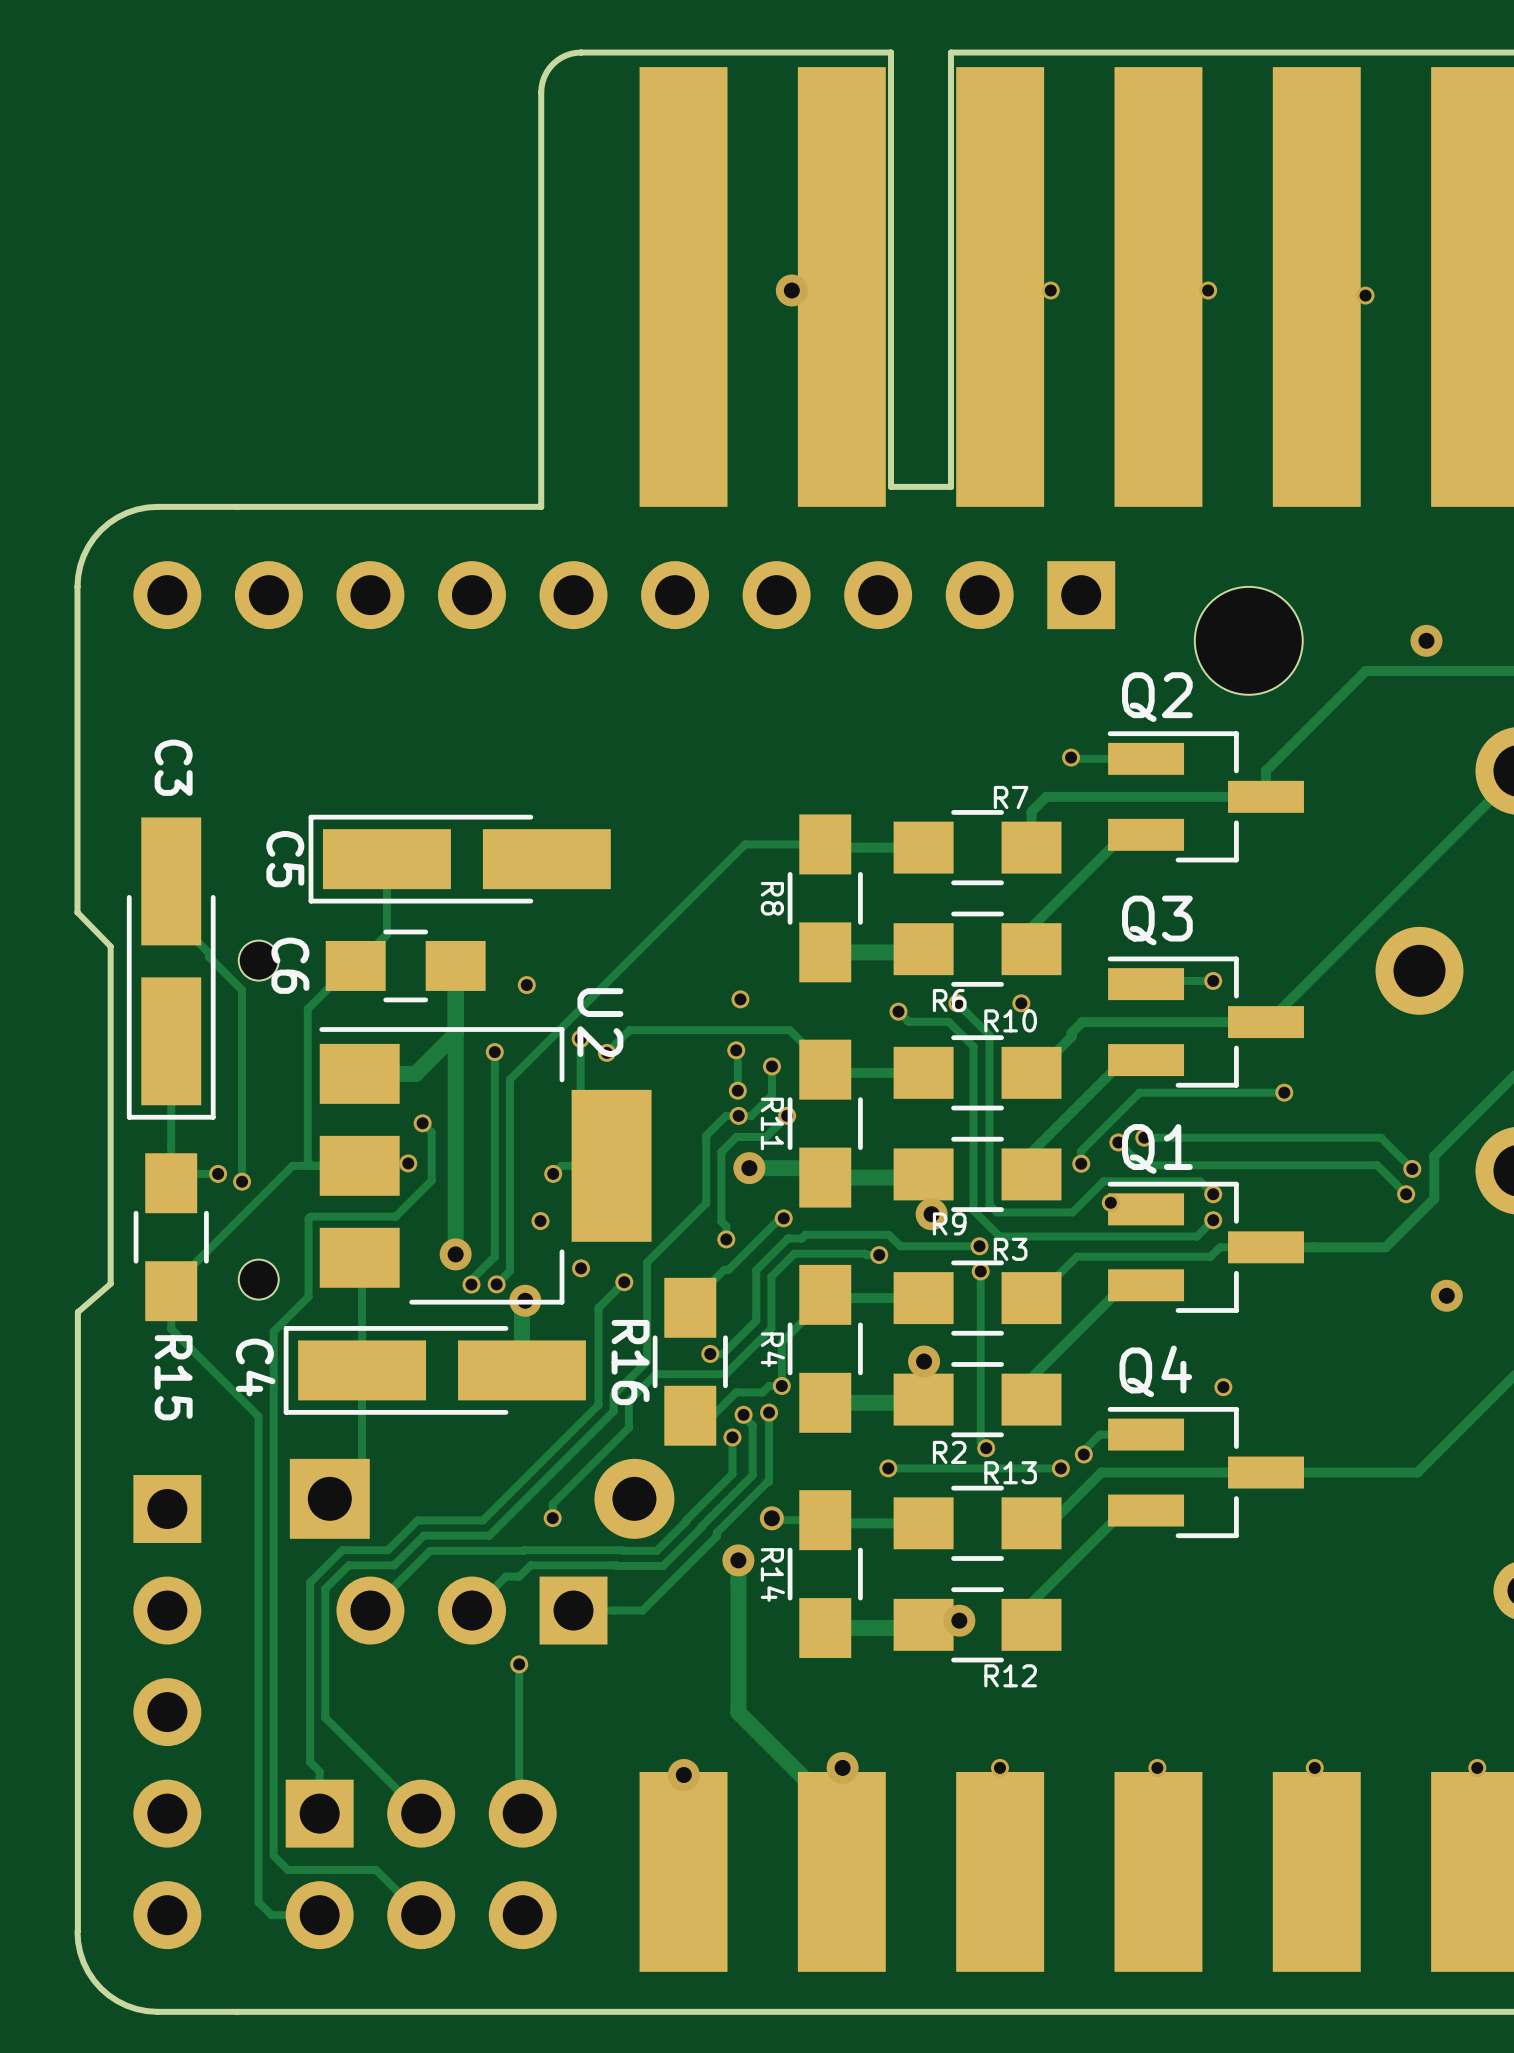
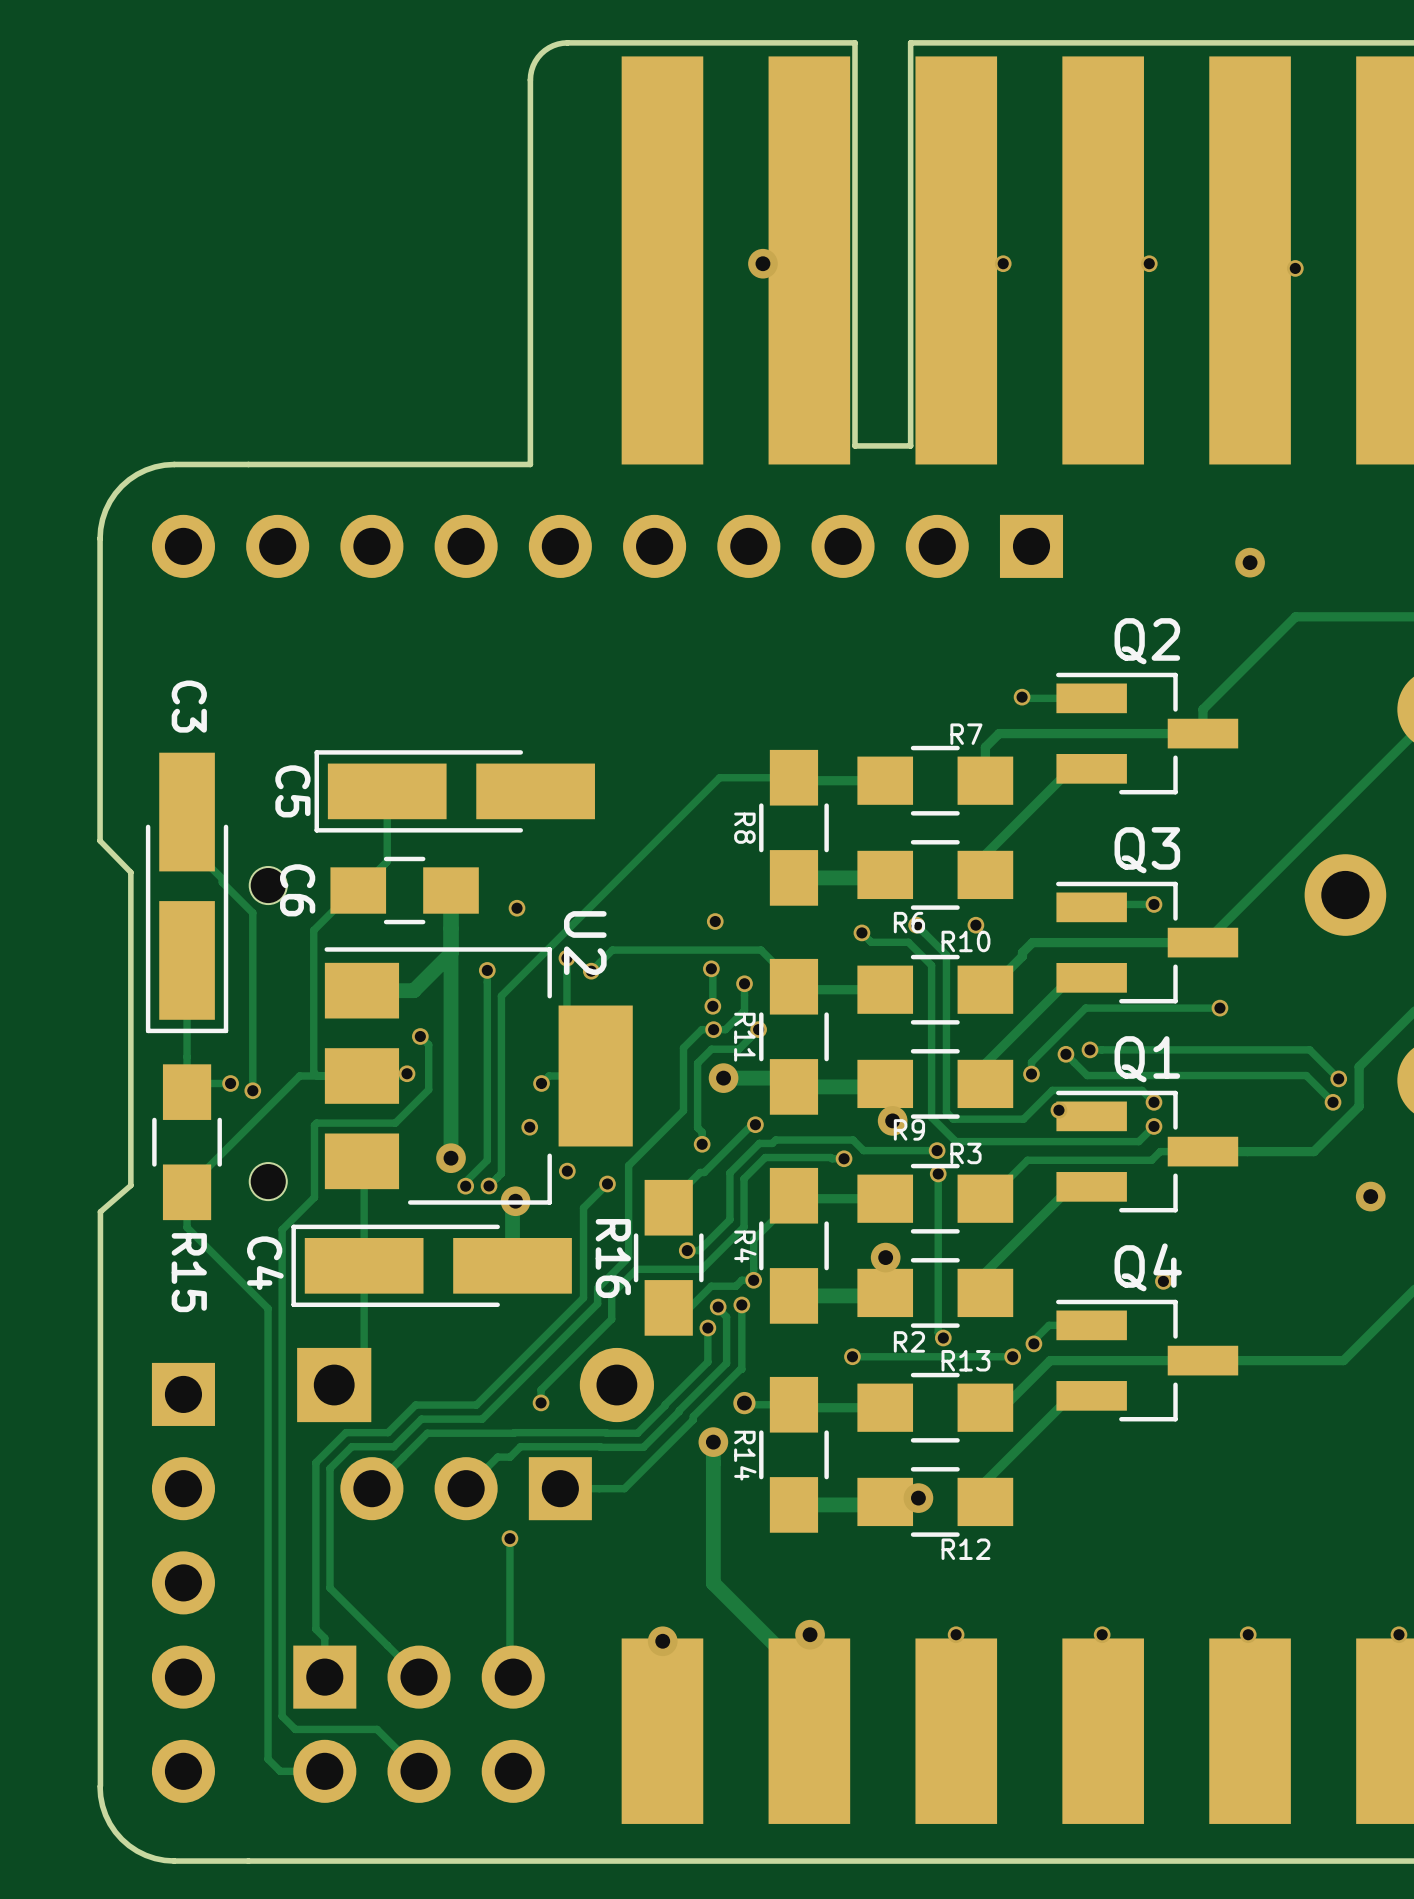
part: (1248, 640) -> none
via position: (1426, 640) -> (1250, 562)
Q2 name position: Q2 (1157, 697) -> Q2 (1147, 641)
Q3 name position: Q3 (1157, 920) -> Q3 (1147, 850)
Q1 name position: Q1 (1157, 1148) -> Q1 (1147, 1059)
Q4 name position: Q4 (1155, 1371) -> Q4 (1148, 1267)

